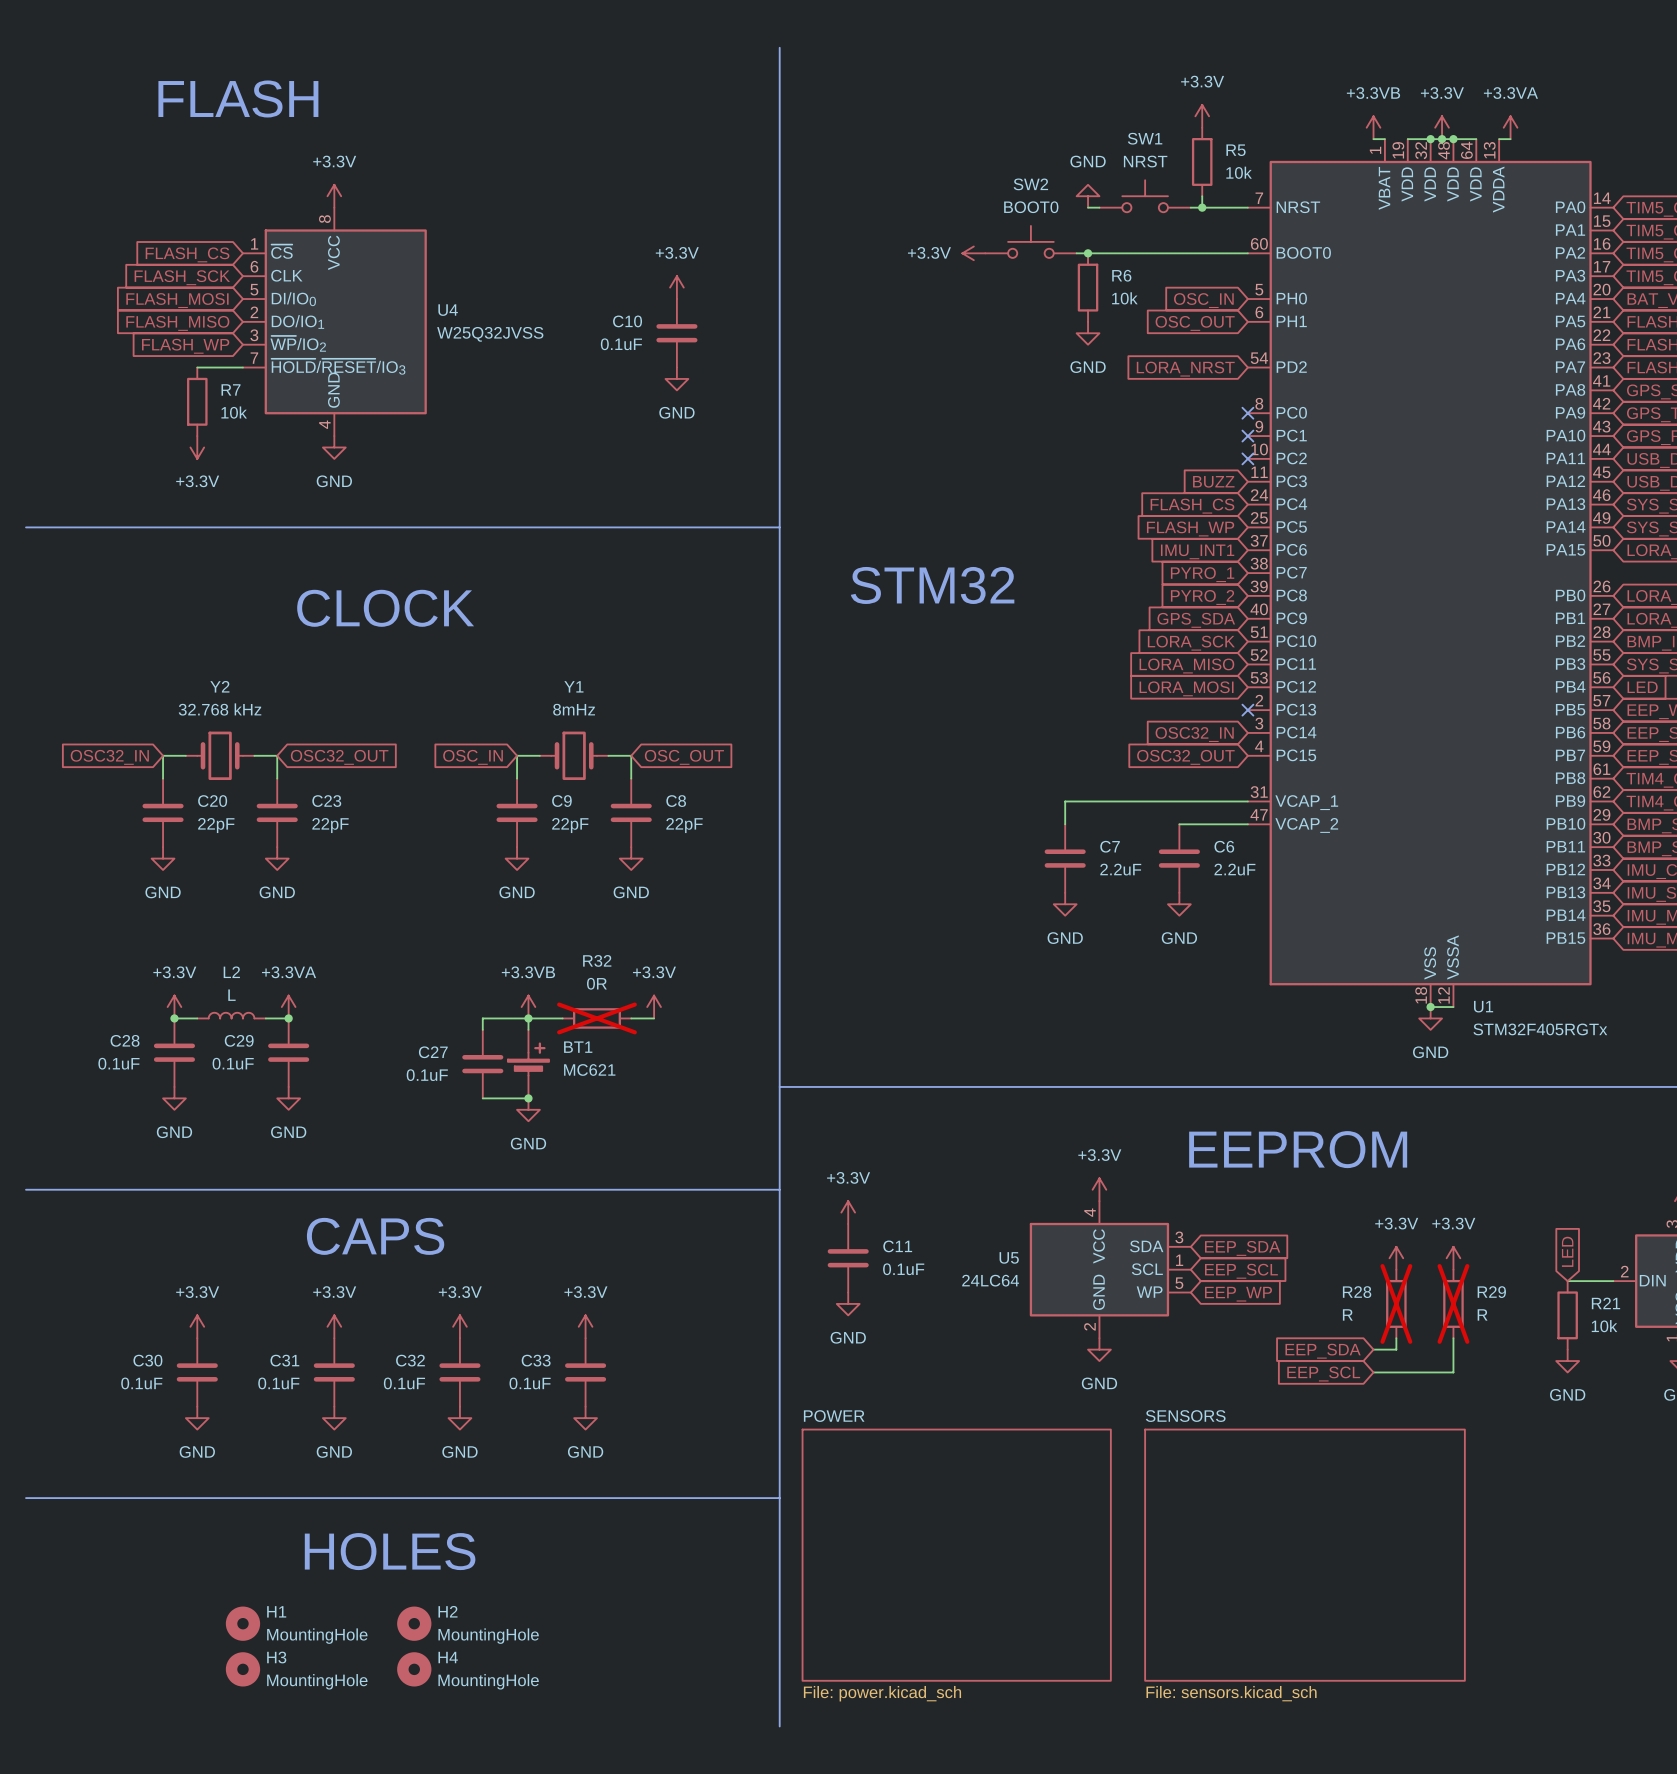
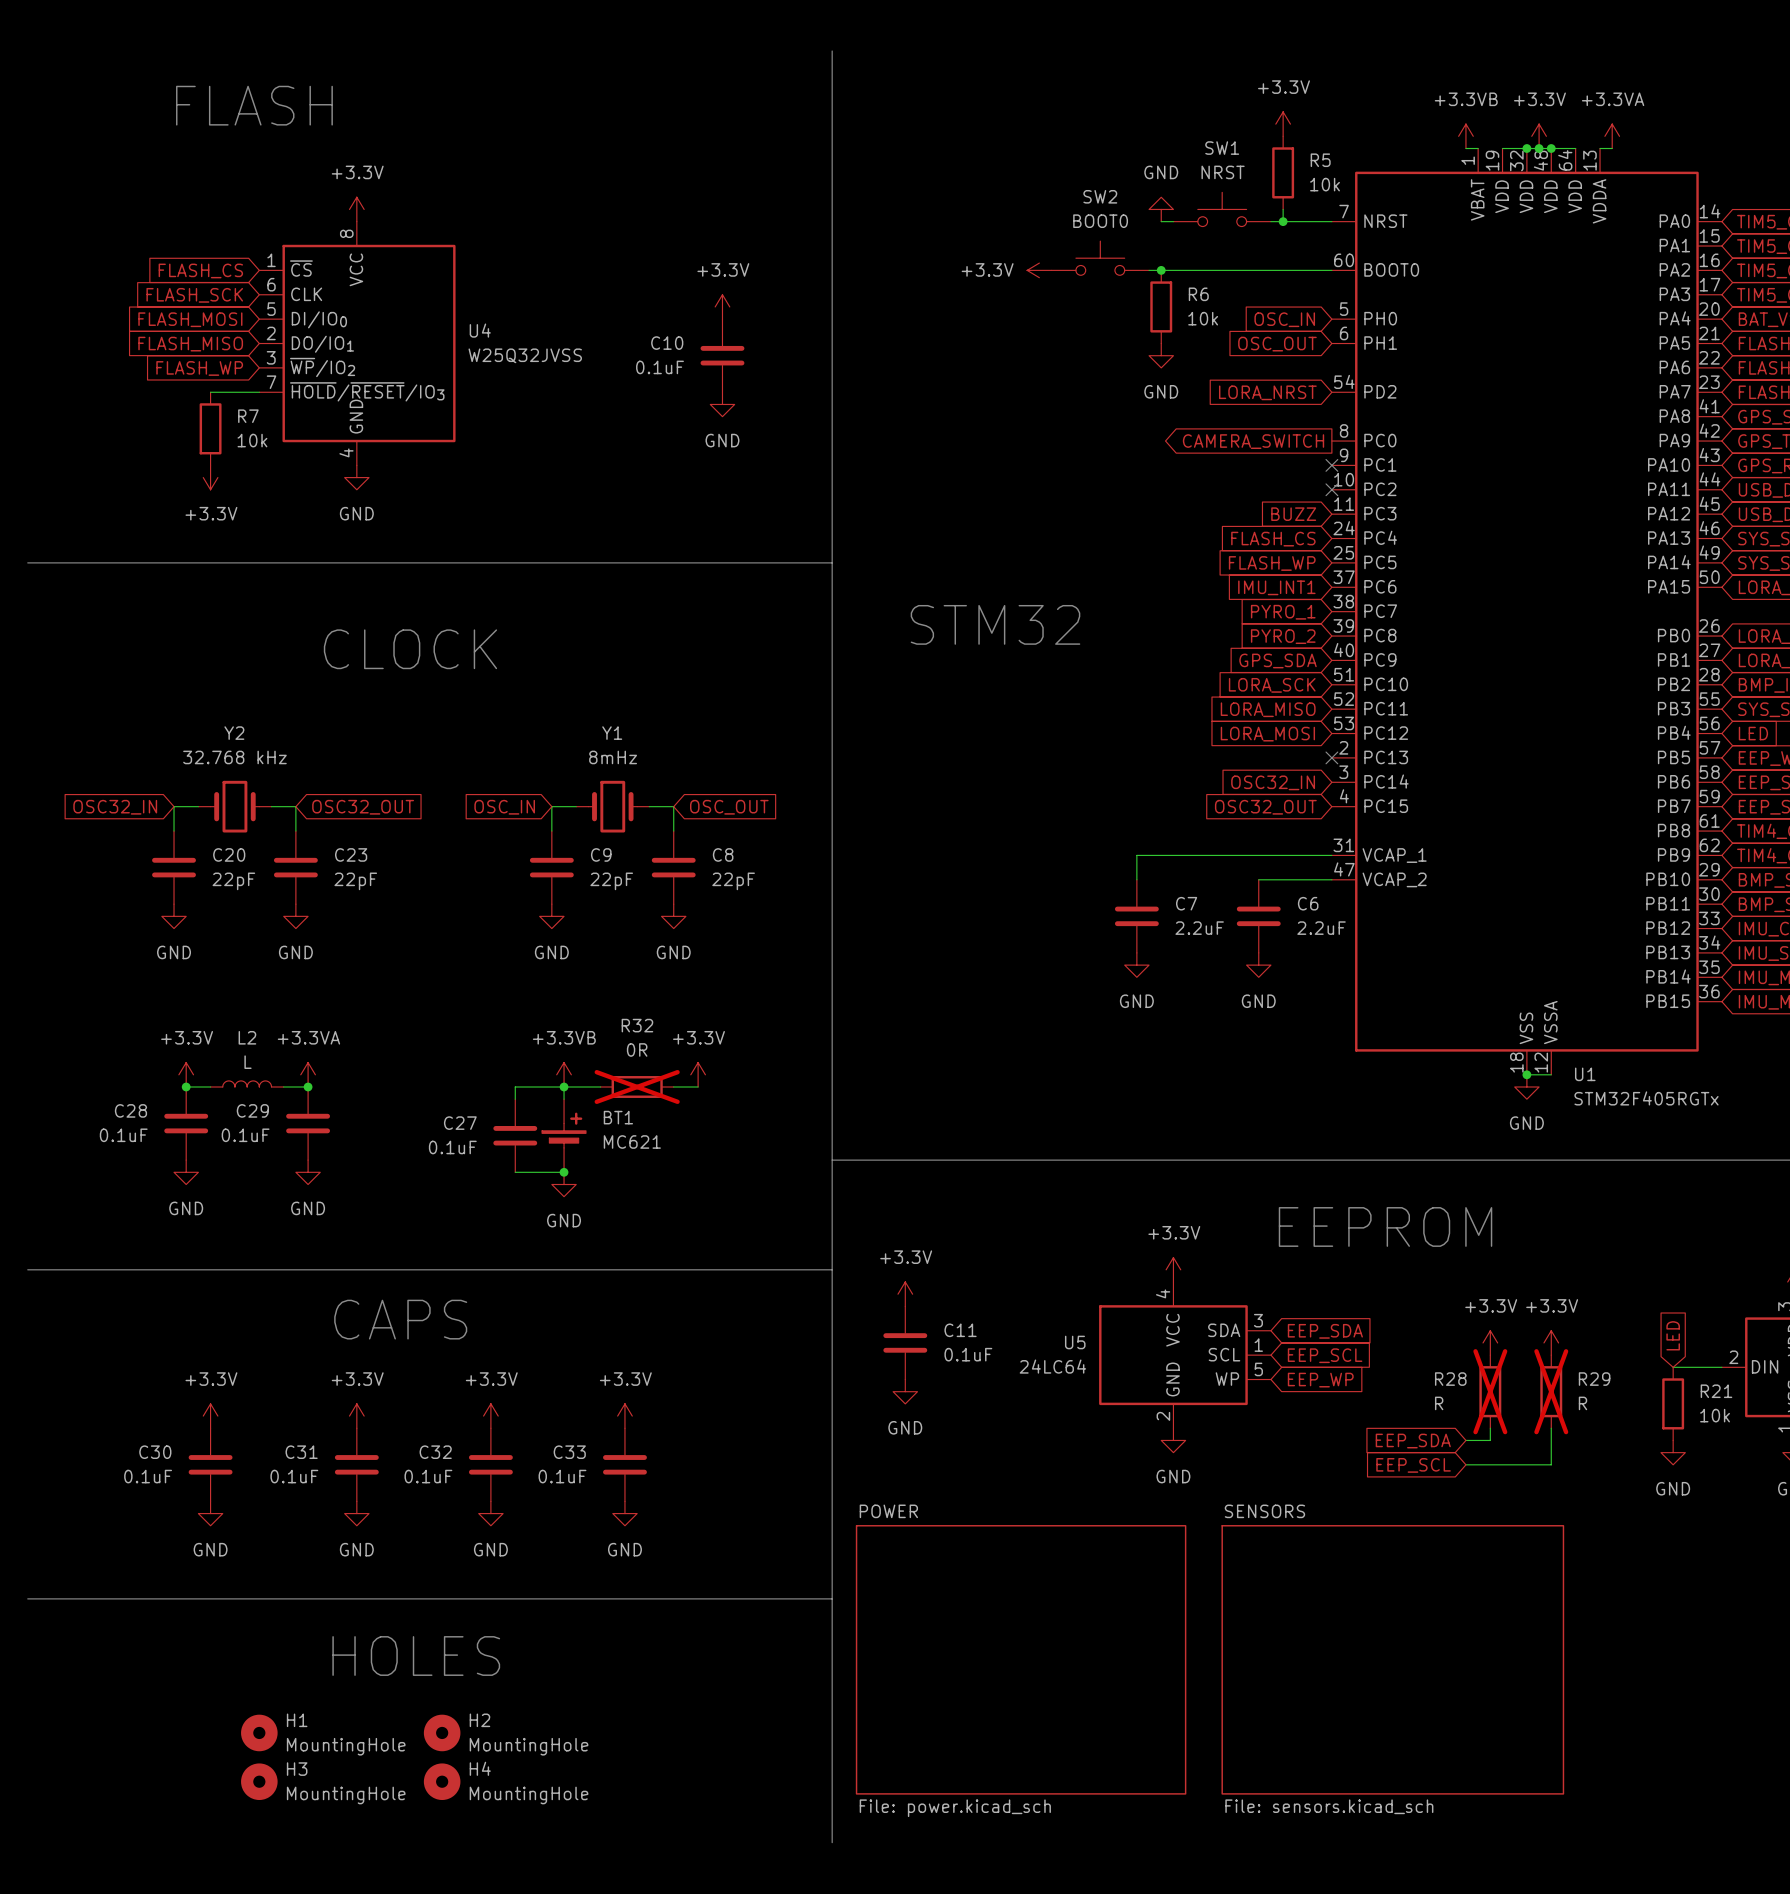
no-connect mark: (1247, 413) -> none
global label: none -> CAMERA_SWITCH (1253, 441)

